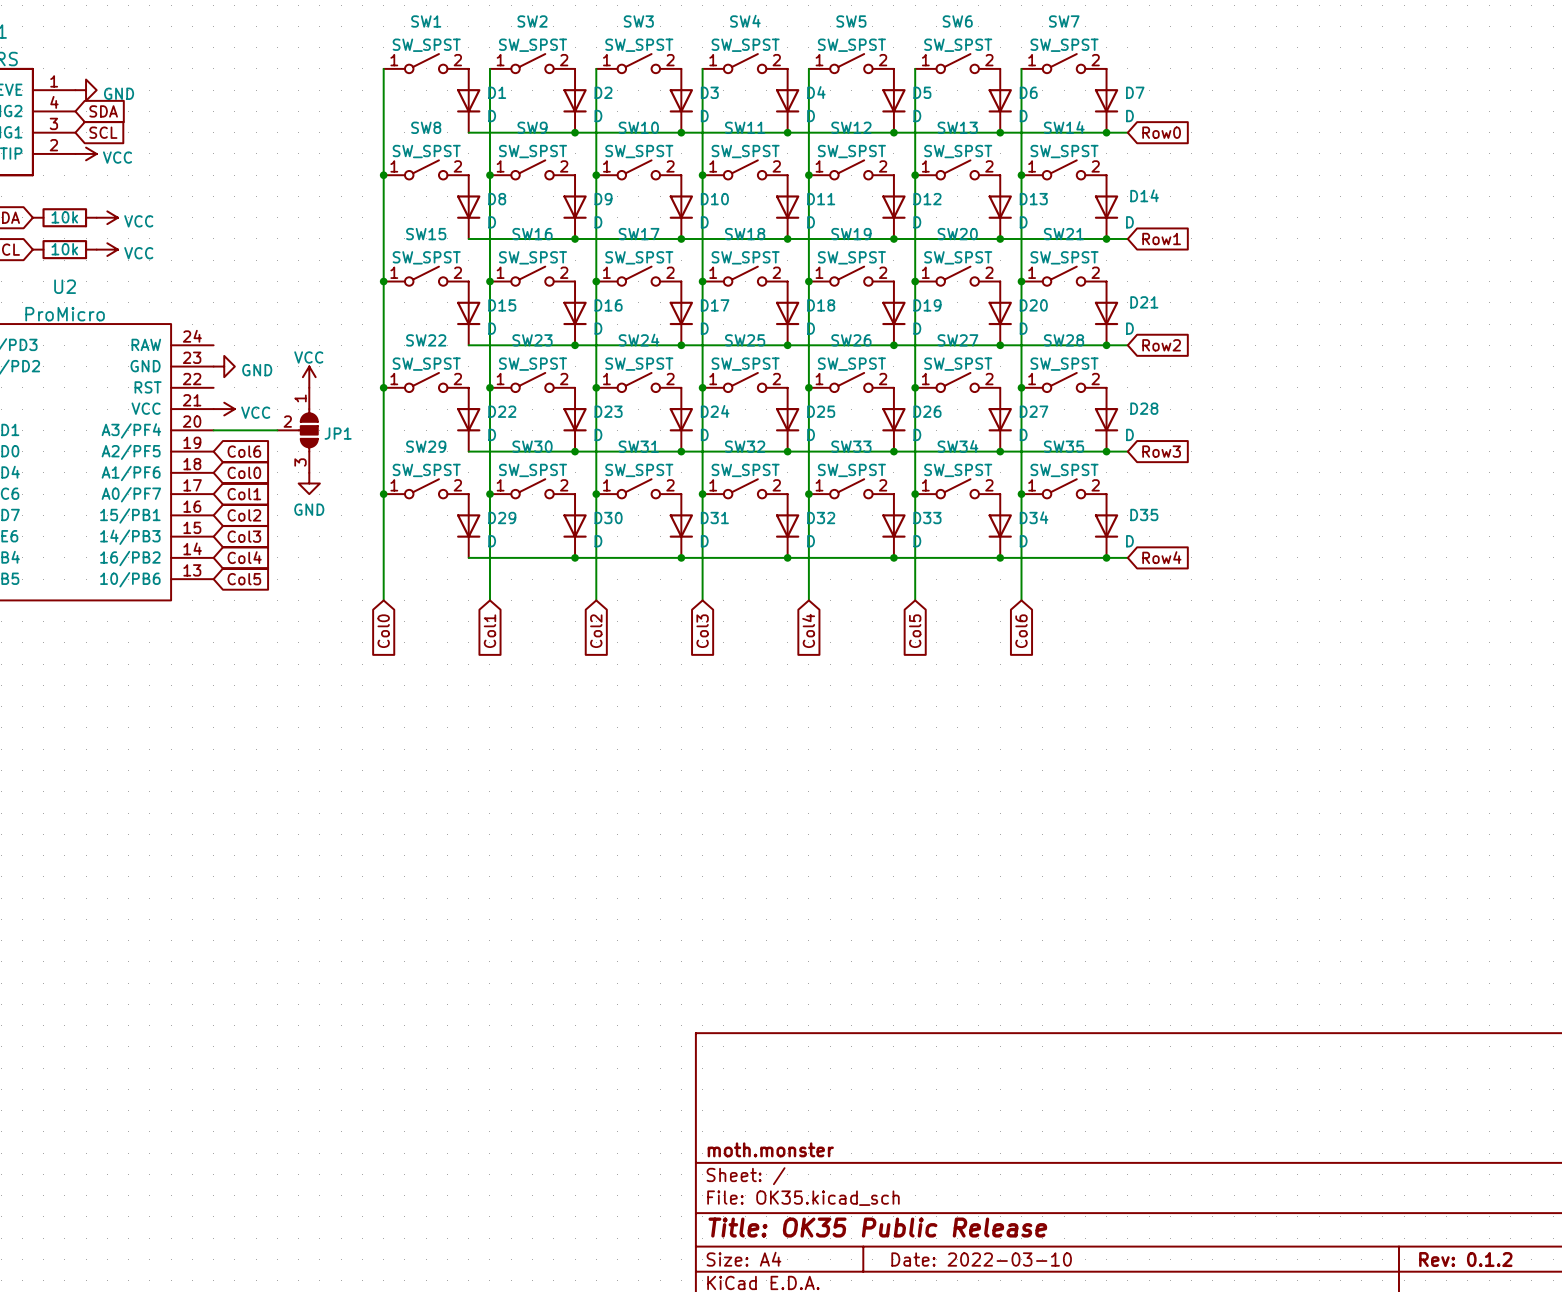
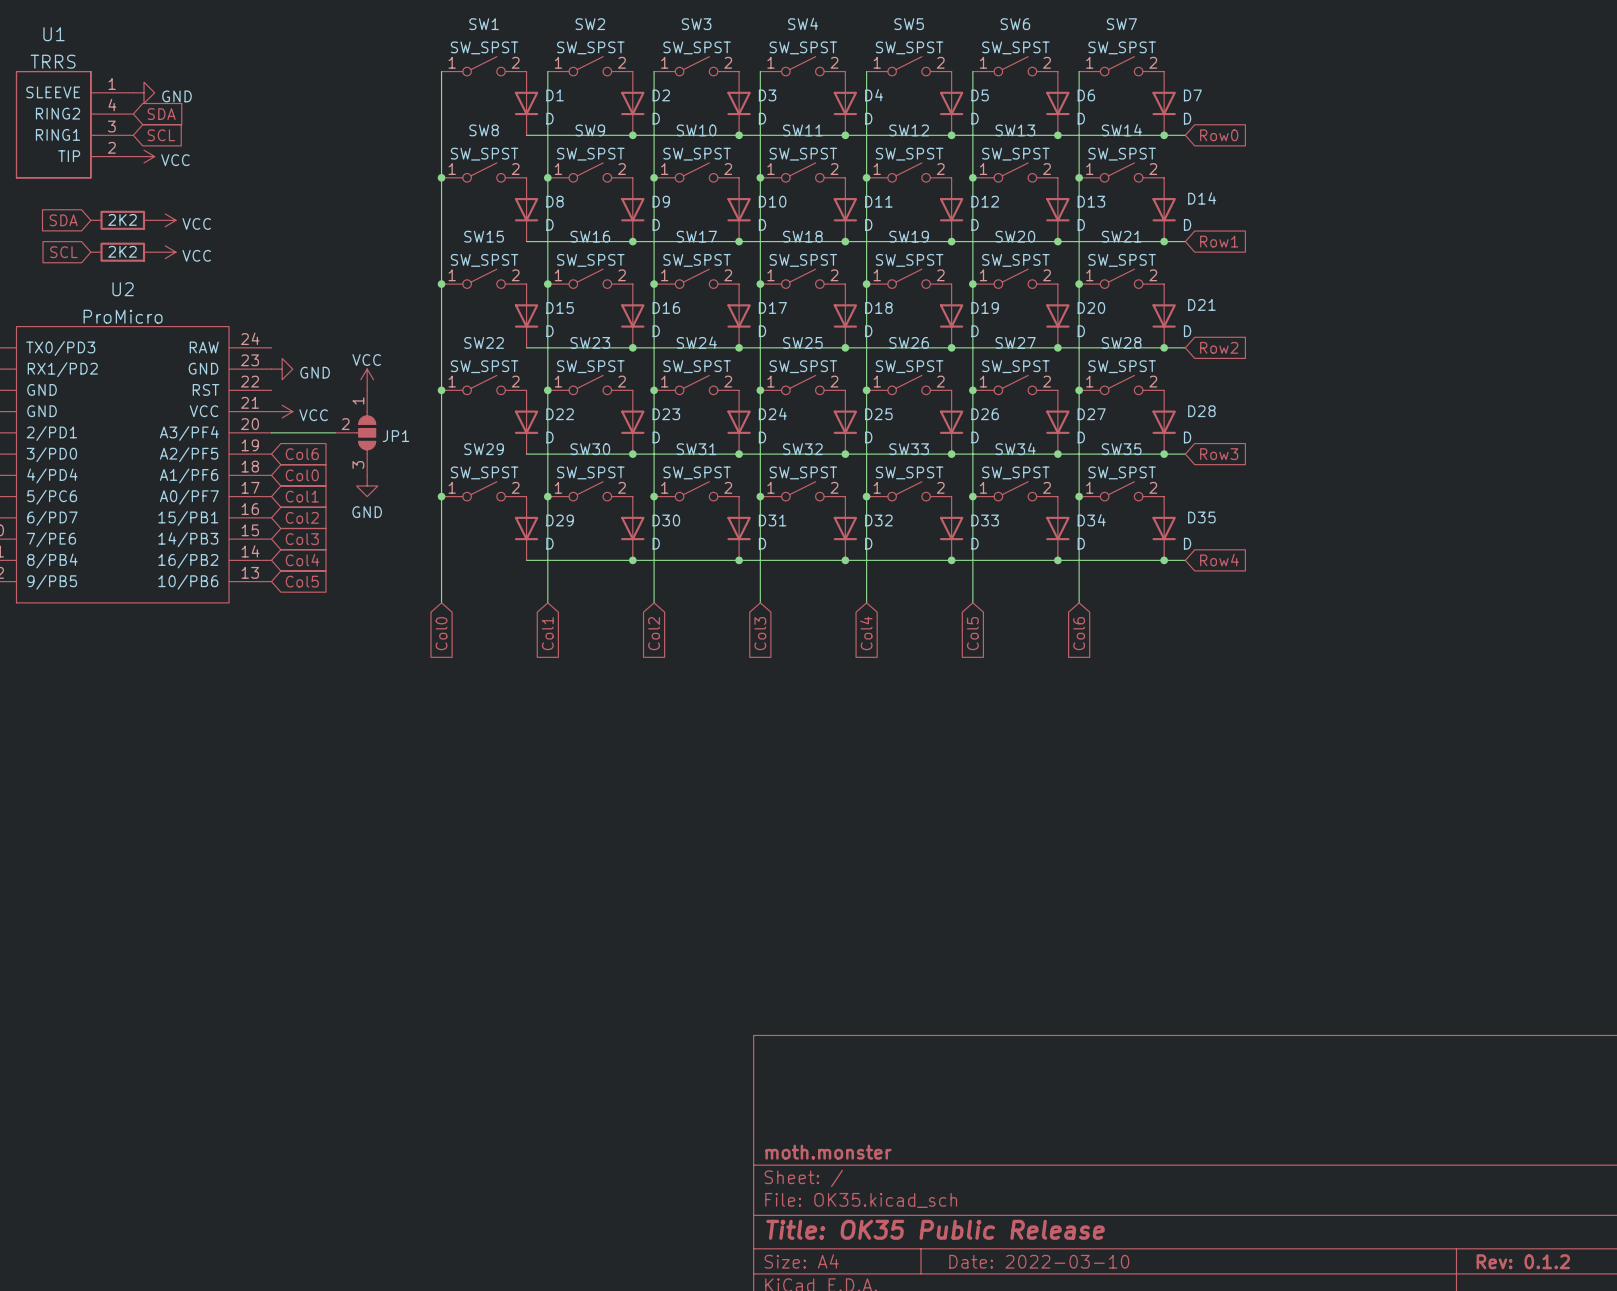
part value: 10k (64, 217) -> 2K2 (122, 219)
part value: 10k (64, 249) -> 2K2 (122, 251)

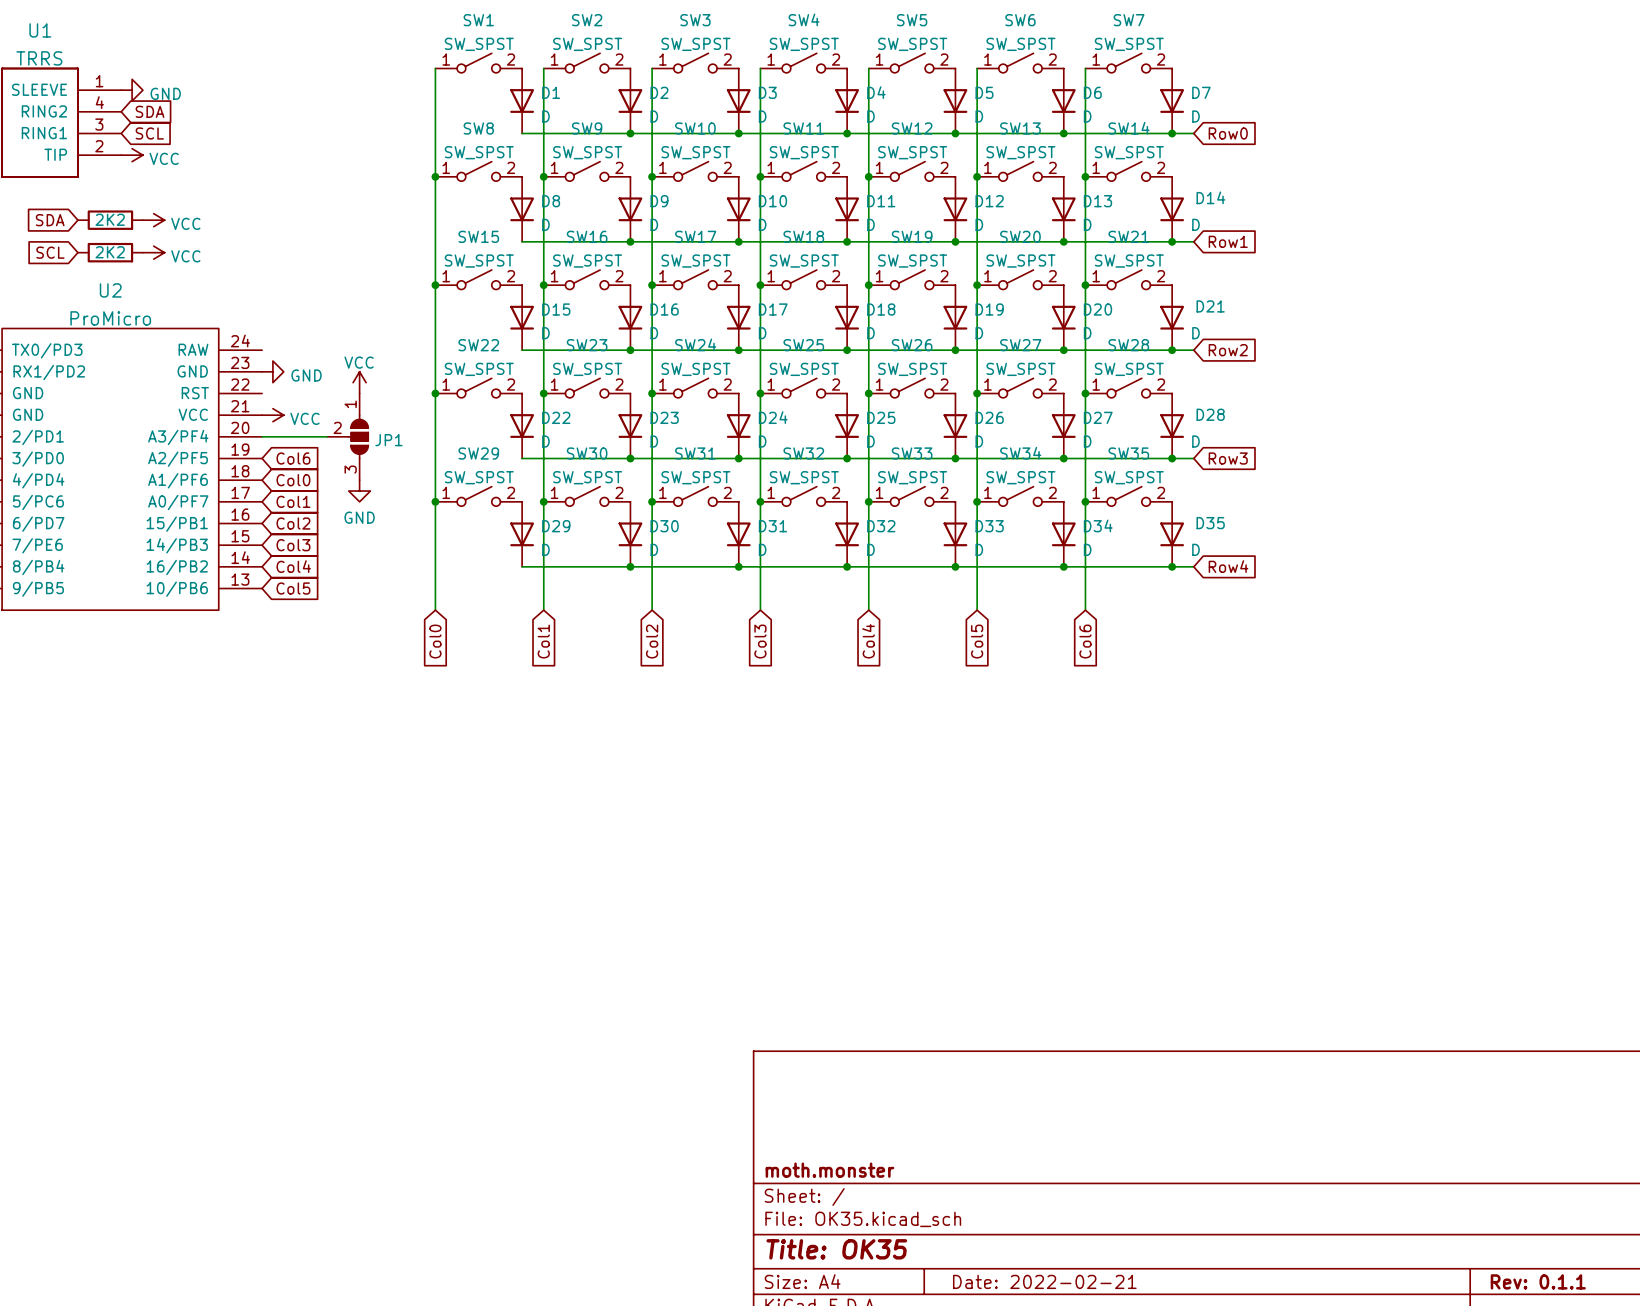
title block: Title: OK35 Public Release (935, 1229) -> Title: OK35 (836, 1249)
title block: Date: 2022-03-10 (1039, 1261) -> Date: 2022-02-21 (1044, 1281)
title block: Rev: 0.1.2 (1523, 1261) -> Rev: 0.1.1 (1538, 1281)

